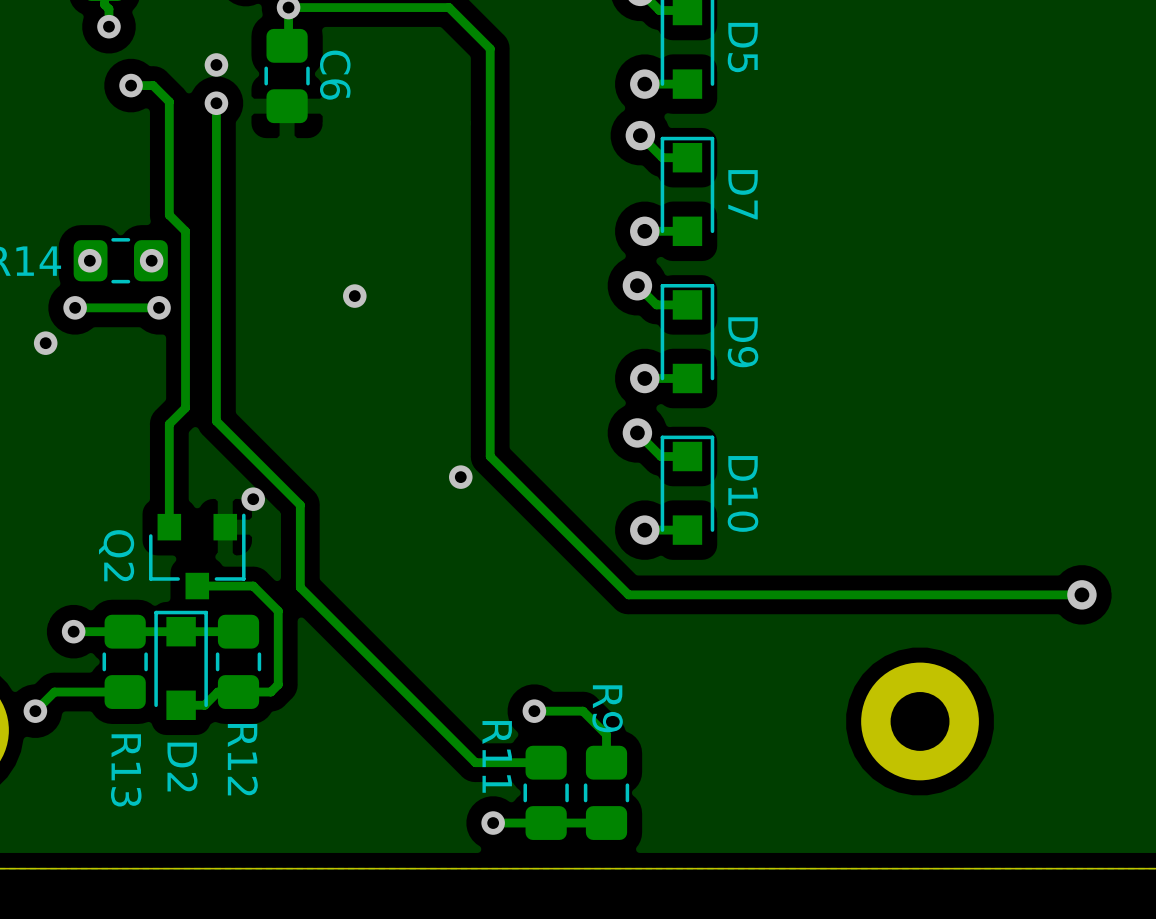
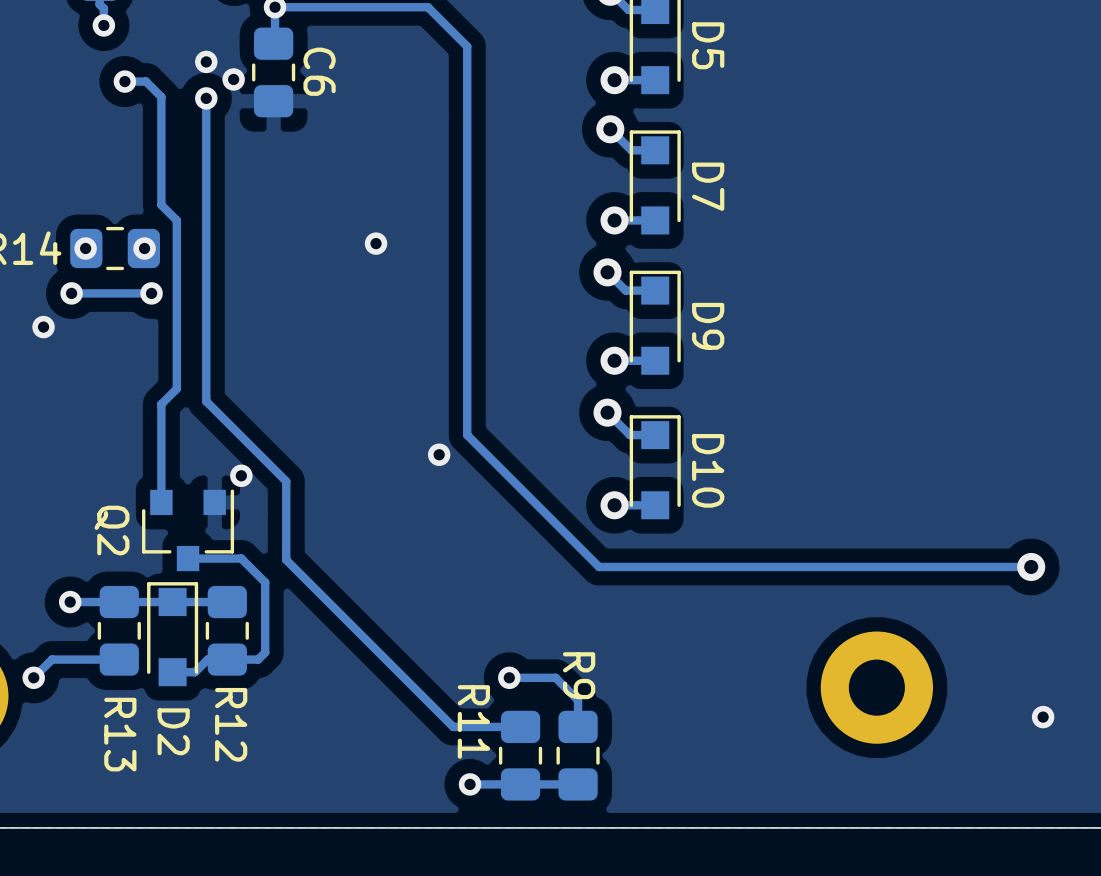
via: none -> (233, 79)
via position: (354, 296) -> (376, 243)
via: none -> (1043, 717)

